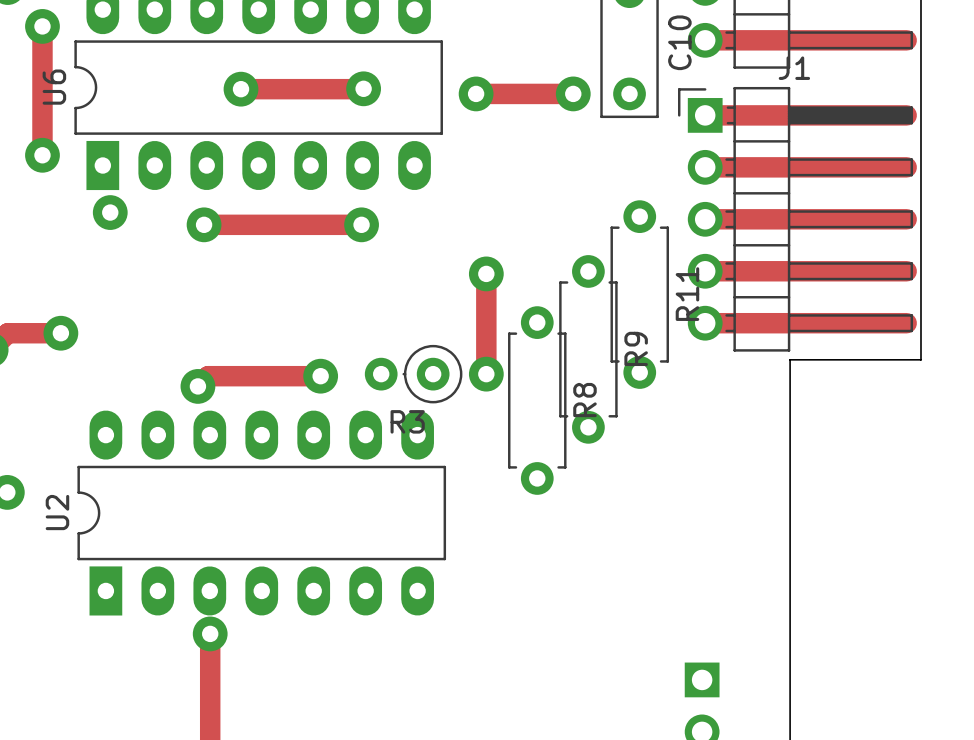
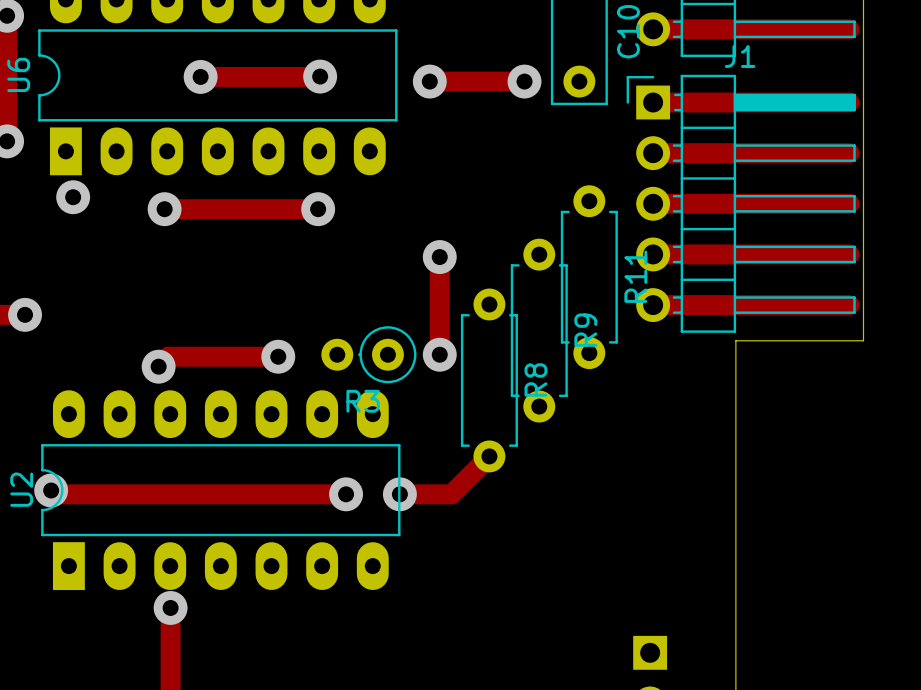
track: none -> (489, 456) (451, 494) (399, 494)
track: none -> (51, 490) (54, 494) (346, 494)
via: none -> (51, 490)
via: none -> (346, 494)
via: none -> (399, 494)

